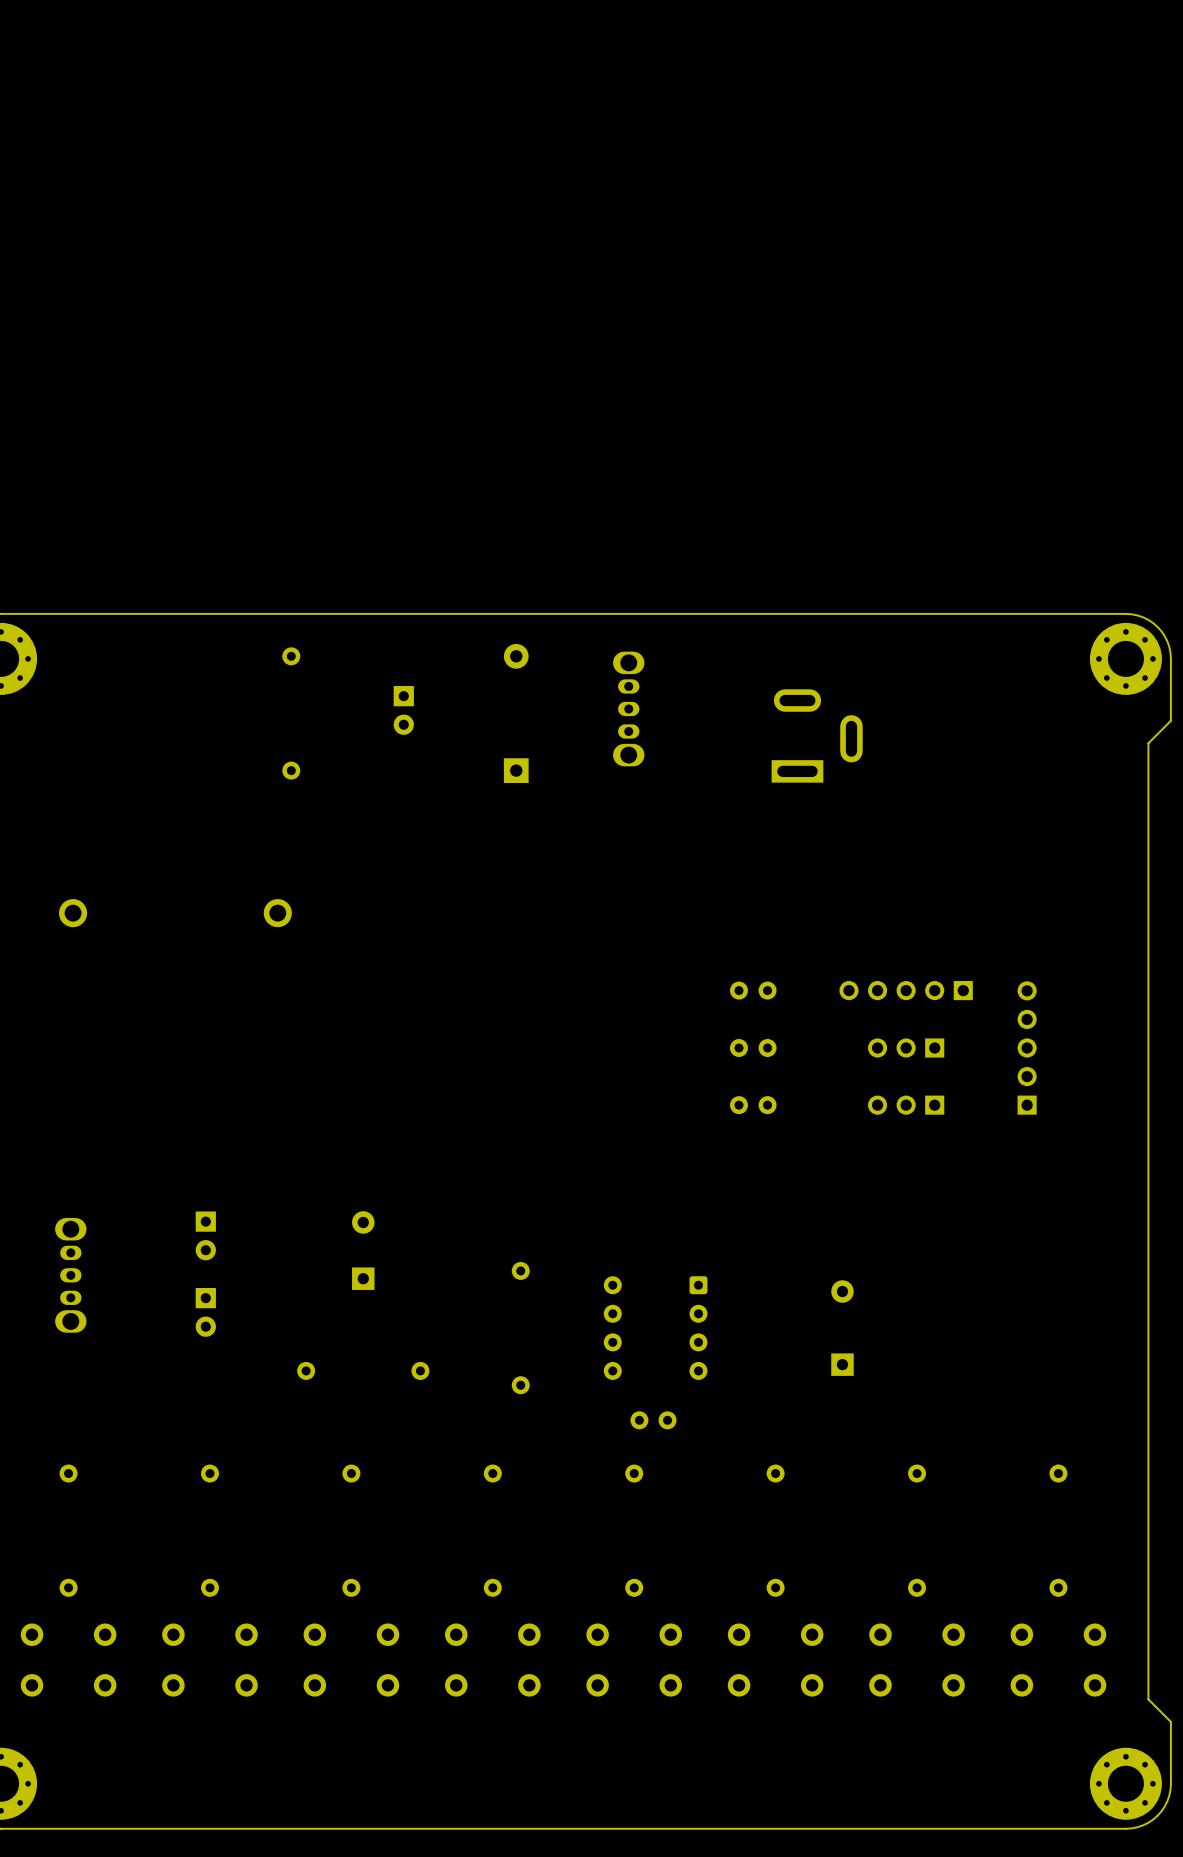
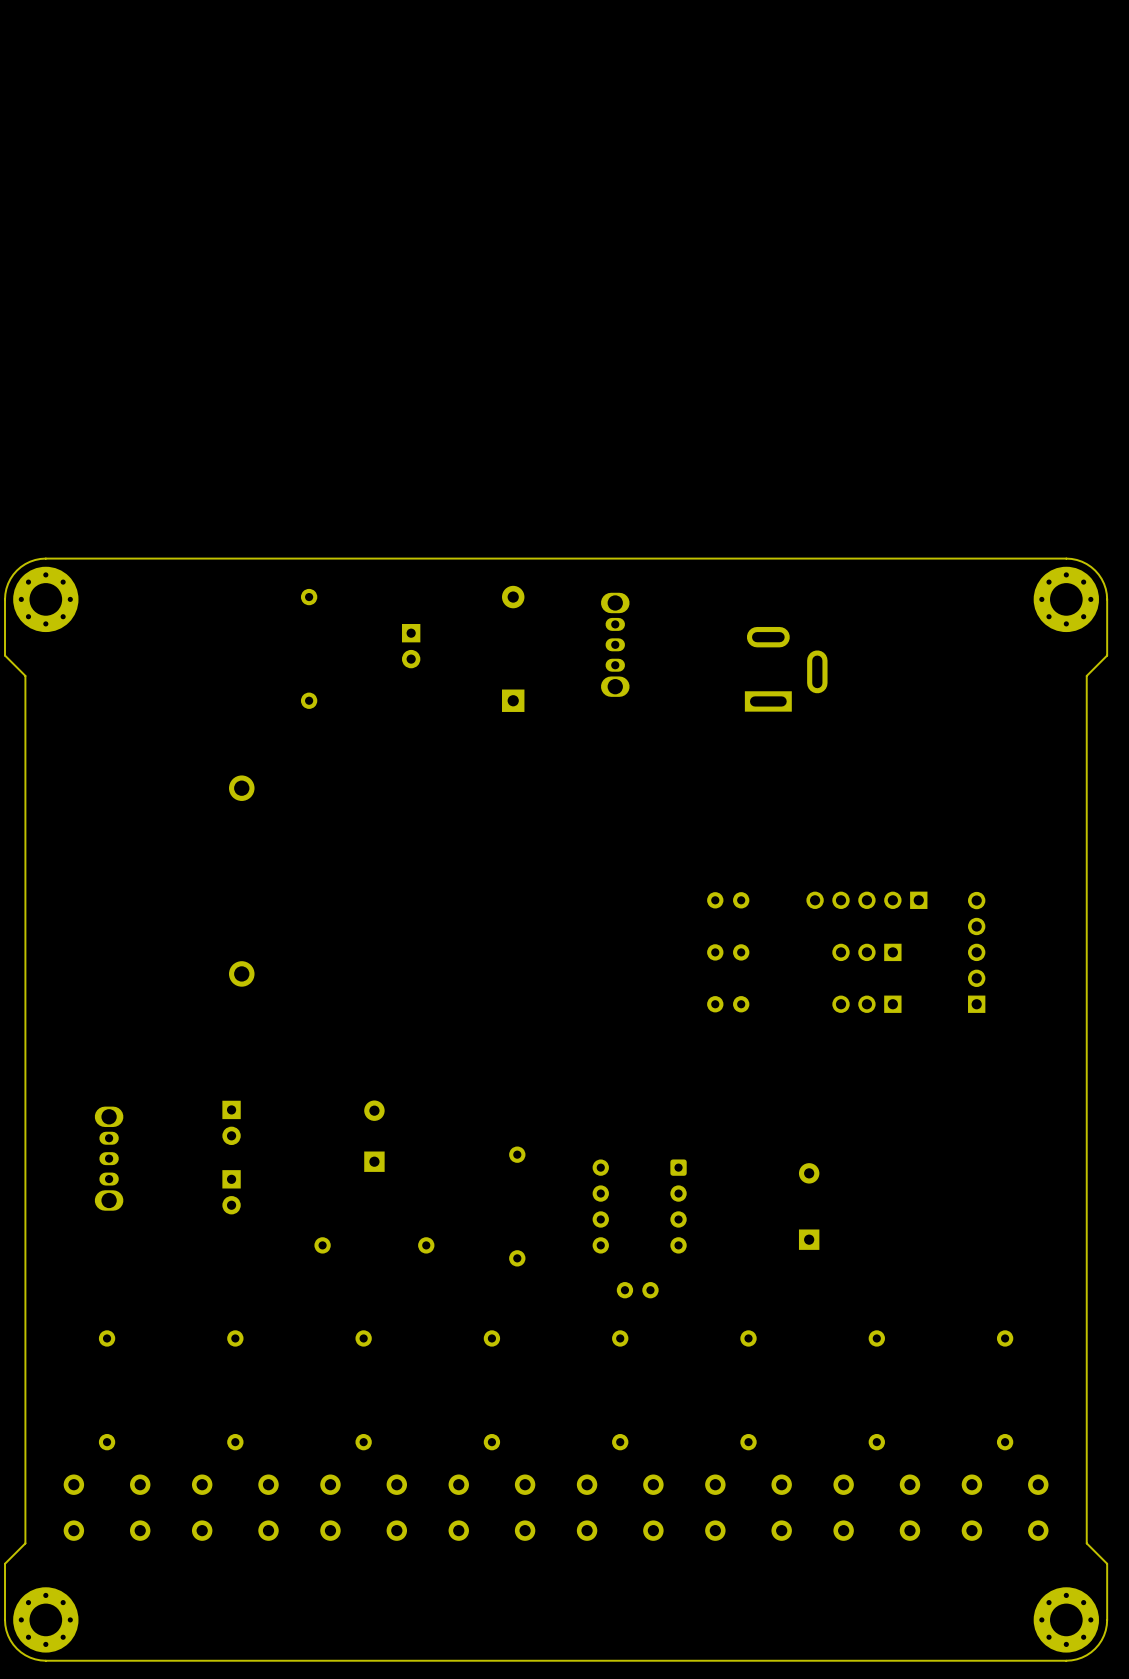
part: none -> (241, 788)
part: (73, 913) -> none
part: (277, 913) -> none
part: none -> (241, 973)

